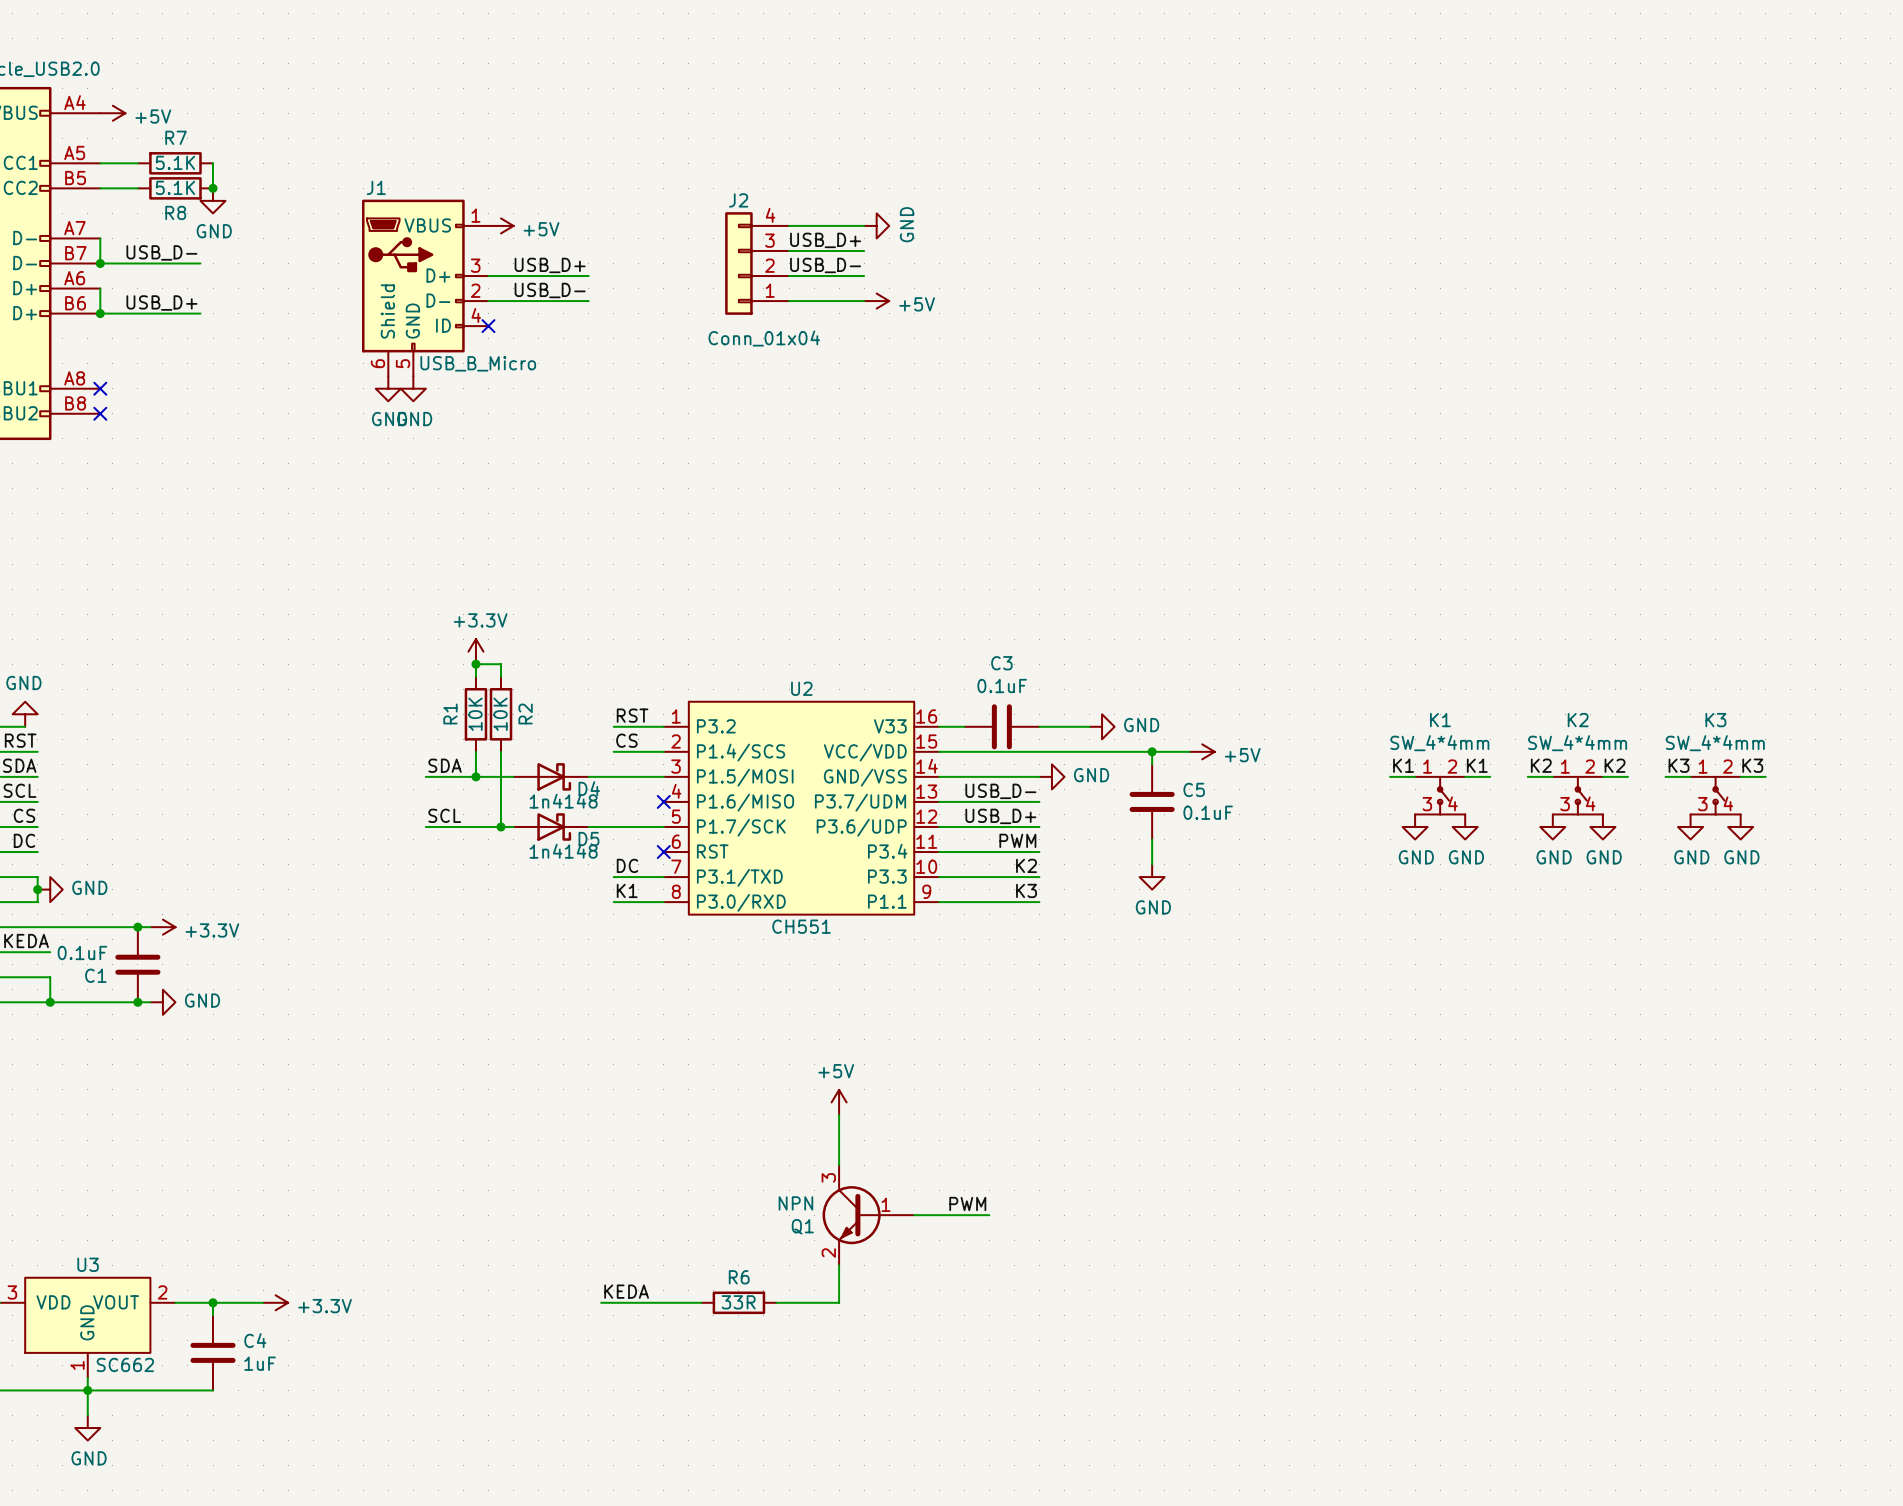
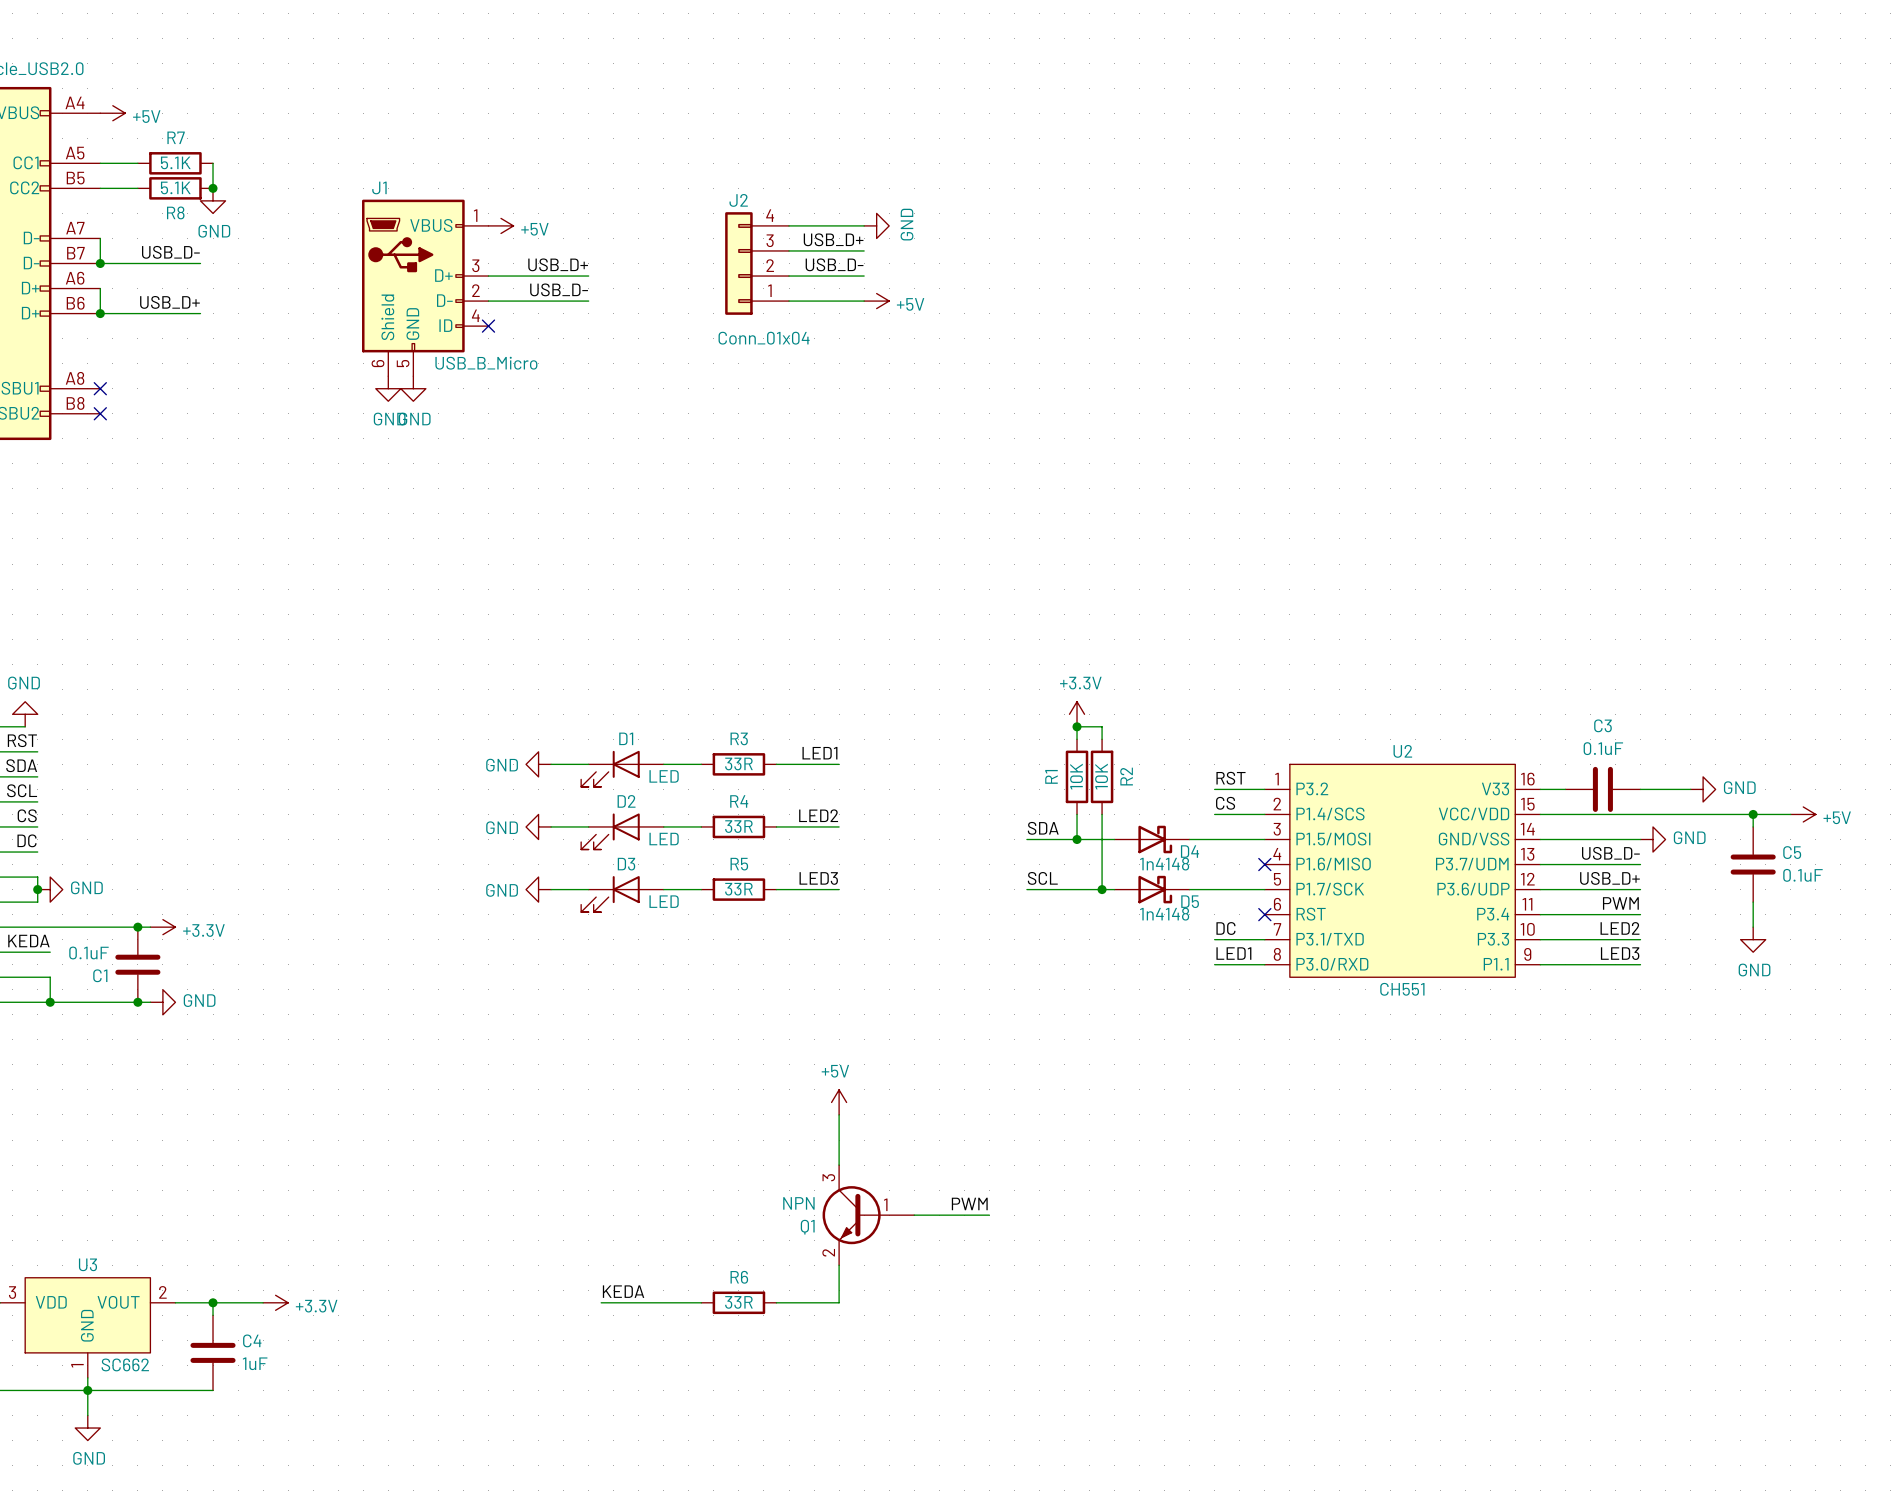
power symbol: +3.3V (475, 651) -> none
junction: (475, 664) -> none
wire: (475, 676) (475, 664) (501, 664) (501, 676) -> none
R1 position: (475, 714) -> (1077, 776)
R2 position: (501, 714) -> (1102, 776)
power symbol: none -> +3.3V (1077, 714)
label: RST (632, 715) -> none
wire: (613, 726) (663, 726) -> none
wire: (939, 726) (964, 726) -> none
C3 position: (1001, 726) -> (1602, 789)
wire: (1039, 726) (1077, 726) -> (1077, 739) (1077, 726)
junction: none -> (1077, 726)
power symbol: GND (1102, 726) -> none
label: CS (626, 740) -> none
wire: (475, 751) (475, 776) -> none
wire: (501, 751) (501, 826) -> none
wire: (613, 751) (663, 751) -> none
wire: (939, 751) (1189, 751) -> none
wire: (1152, 751) (1152, 764) -> none
junction: (1152, 751) -> none
power symbol: +5V (1202, 751) -> none
label: none -> LED1 (819, 753)
power symbol: none -> GND (538, 764)
wire: none -> (551, 764) (588, 764)
wire: none -> (663, 764) (701, 764)
R3: none -> 33R (738, 764)
label: SDA (445, 765) -> none
label: K1 (1403, 765) -> none
label: K1 (1477, 765) -> none
label: K2 (1541, 765) -> none
label: K2 (1615, 765) -> none
label: K3 (1679, 765) -> none
label: K3 (1752, 765) -> none
D1: none -> LED (622, 768)
wire: (425, 776) (513, 776) -> none
junction: (475, 776) -> none
D4 position: (551, 776) -> (1152, 839)
wire: (588, 776) (663, 776) -> none
wire: (939, 776) (1039, 776) -> none
power symbol: GND (1051, 776) -> none
wire: (1527, 776) (1552, 776) -> (1540, 789) (1565, 789)
wire: (1602, 776) (1627, 776) -> none
wire: (1665, 776) (1690, 776) -> none
wire: (1740, 776) (1765, 776) -> none
label: none -> RST (1230, 778)
wire: none -> (1214, 789) (1264, 789)
wire: none -> (1640, 789) (1690, 789)
power symbol: none -> GND (1703, 789)
label: USB_D- (1000, 791) -> none
K1: SW_4*4mm (1440, 795) -> none
K2: SW_4*4mm (1577, 795) -> none
K3: SW_4*4mm (1715, 795) -> none
no-connect mark: (663, 801) -> none
wire: (939, 801) (1039, 801) -> none
C5 position: (1152, 801) -> (1753, 864)
label: none -> CS (1225, 803)
U2 position: (801, 808) -> (1402, 870)
wire: none -> (1102, 814) (1102, 889)
wire: none -> (1214, 814) (1264, 814)
wire: none -> (1540, 814) (1790, 814)
wire: none -> (1753, 814) (1753, 826)
junction: none -> (1753, 814)
power symbol: none -> +5V (1803, 814)
label: SCL (444, 815) -> none
label: none -> LED2 (818, 815)
label: USB_D+ (1000, 816) -> none
wire: (425, 826) (513, 826) -> none
junction: (501, 826) -> none
power symbol: none -> GND (538, 826)
D5 position: (551, 826) -> (1152, 889)
R4: none -> 33R (738, 826)
wire: (939, 826) (1039, 826) -> none
power symbol: GND (1415, 826) -> none
power symbol: GND (1465, 826) -> none
power symbol: GND (1552, 826) -> none
power symbol: GND (1602, 826) -> none
power symbol: GND (1690, 826) -> none
power symbol: GND (1740, 826) -> none
label: none -> SDA (1043, 828)
D2: none -> LED (622, 831)
wire: none -> (1026, 839) (1114, 839)
junction: none -> (1077, 839)
wire: (1152, 839) (1152, 864) -> (1077, 814) (1077, 839)
wire: none -> (1189, 839) (1264, 839)
wire: none -> (1540, 839) (1640, 839)
power symbol: none -> GND (1653, 839)
label: PWM (1017, 840) -> none
no-connect mark: (663, 852) -> none
wire: (939, 852) (1039, 852) -> none
label: none -> USB_D- (1610, 853)
no-connect mark: none -> (1264, 864)
wire: none -> (1540, 864) (1640, 864)
label: DC (627, 865) -> none
label: K2 (1026, 865) -> none
wire: (613, 877) (663, 877) -> none
wire: (939, 877) (1039, 877) -> none
power symbol: GND (1152, 877) -> none
label: none -> LED3 (818, 878)
label: none -> SCL (1042, 878)
label: none -> USB_D+ (1609, 878)
power symbol: none -> GND (538, 889)
wire: none -> (551, 889) (588, 889)
wire: none -> (663, 889) (701, 889)
R5: none -> 33R (738, 889)
wire: none -> (1026, 889) (1114, 889)
junction: none -> (1102, 889)
wire: none -> (1189, 889) (1264, 889)
wire: none -> (1540, 889) (1640, 889)
label: K1 (627, 890) -> none
label: K3 (1026, 890) -> none
D3: none -> LED (622, 894)
wire: (613, 902) (663, 902) -> none
wire: (939, 902) (1039, 902) -> none
wire: none -> (1753, 902) (1753, 927)
label: none -> PWM (1620, 903)
no-connect mark: none -> (1264, 914)
wire: none -> (1540, 914) (1640, 914)
label: none -> DC (1225, 928)
label: none -> LED2 (1619, 928)
wire: none -> (1214, 939) (1264, 939)
wire: none -> (1540, 939) (1640, 939)
power symbol: none -> GND (1753, 939)
label: none -> LED1 (1233, 953)
label: none -> LED3 (1620, 953)
wire: none -> (1214, 964) (1264, 964)
wire: none -> (1540, 964) (1640, 964)

